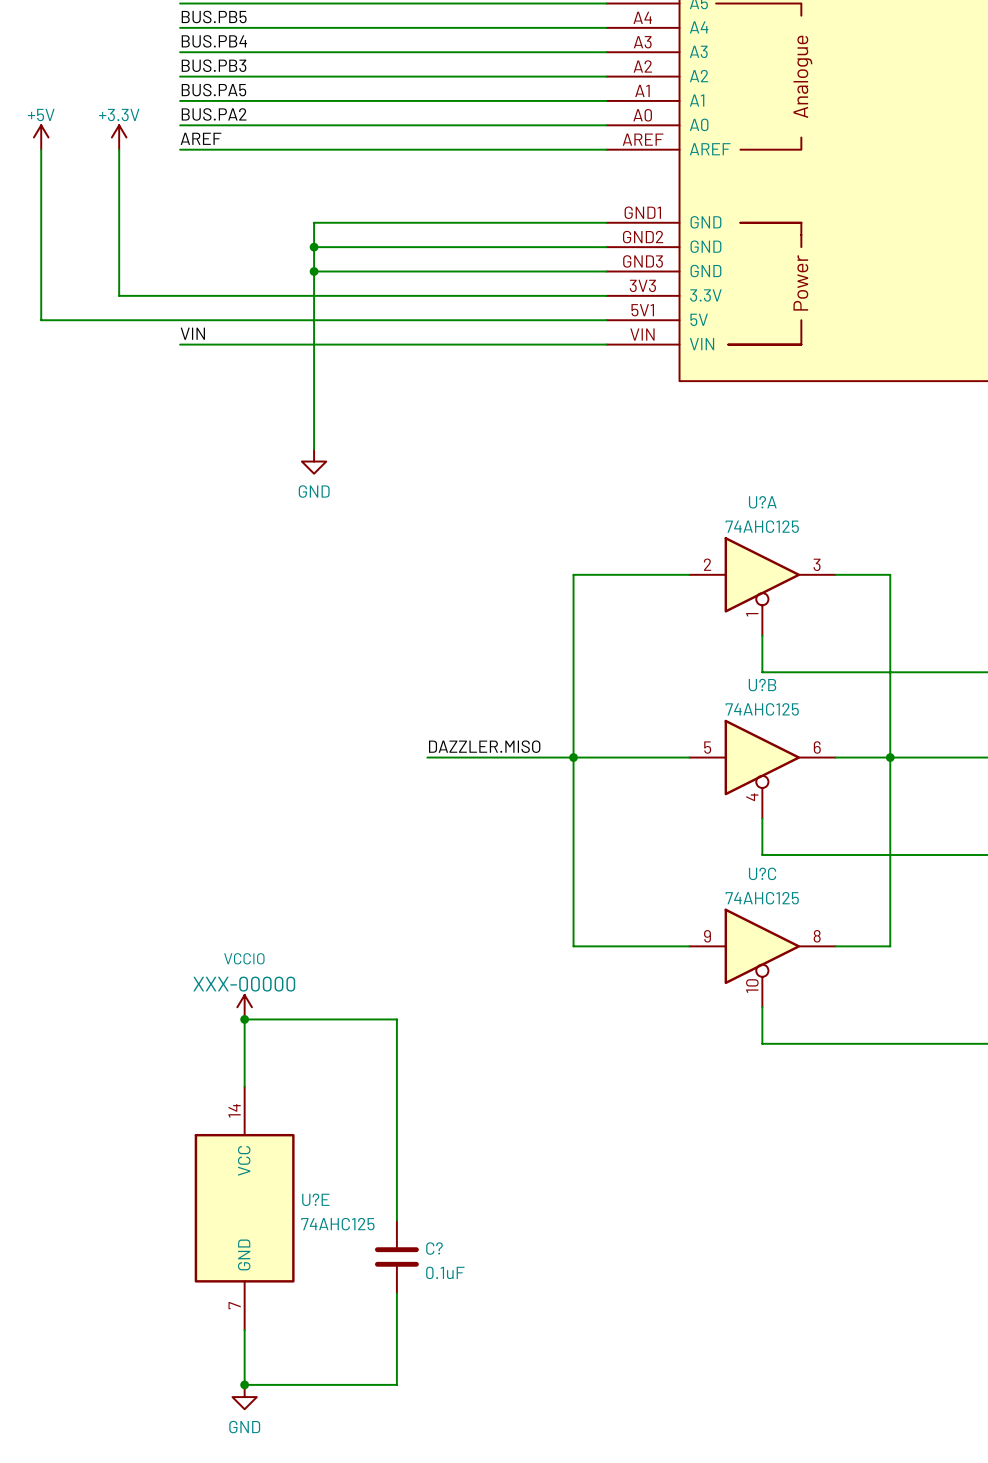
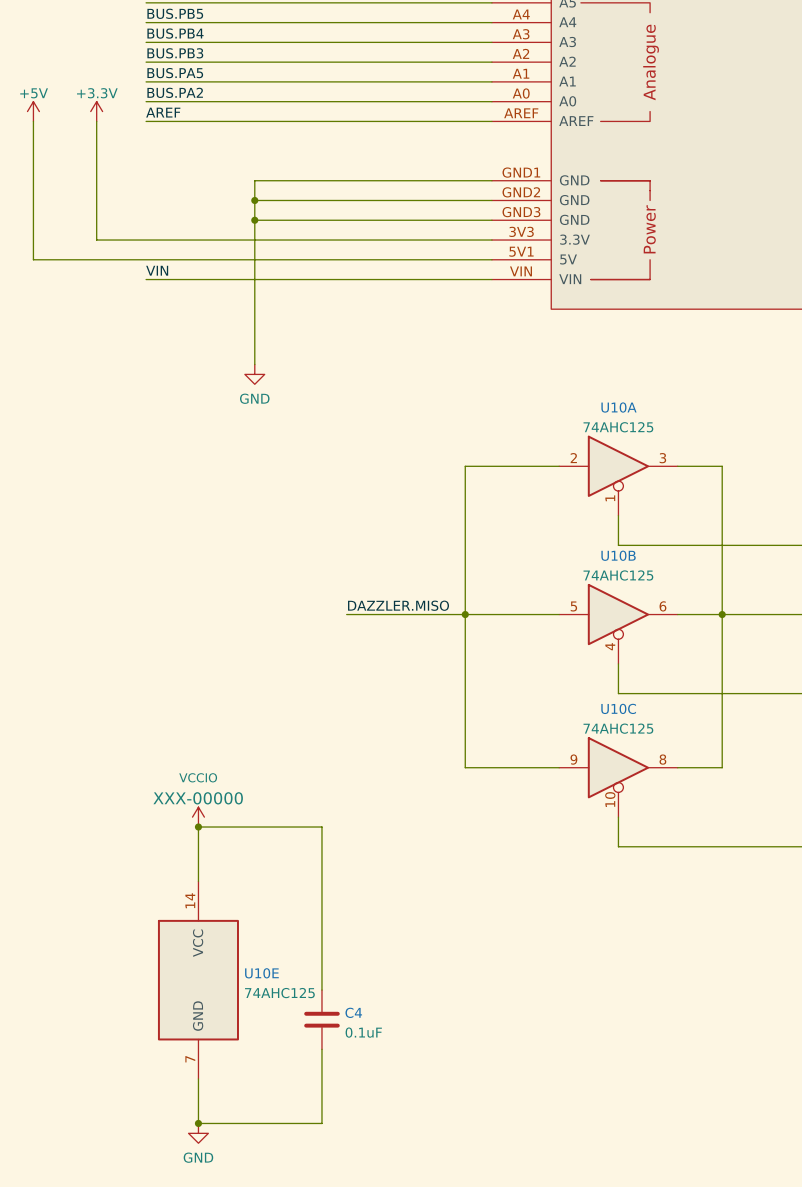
U?A name: U?A (762, 502) -> U10A (618, 407)
U?B name: U?B (762, 685) -> U10B (618, 555)
U?C name: U?C (762, 873) -> U10C (618, 708)
U?E name: U?E (315, 1199) -> U10E (261, 973)
C? name: C? (434, 1248) -> C4 (353, 1012)

